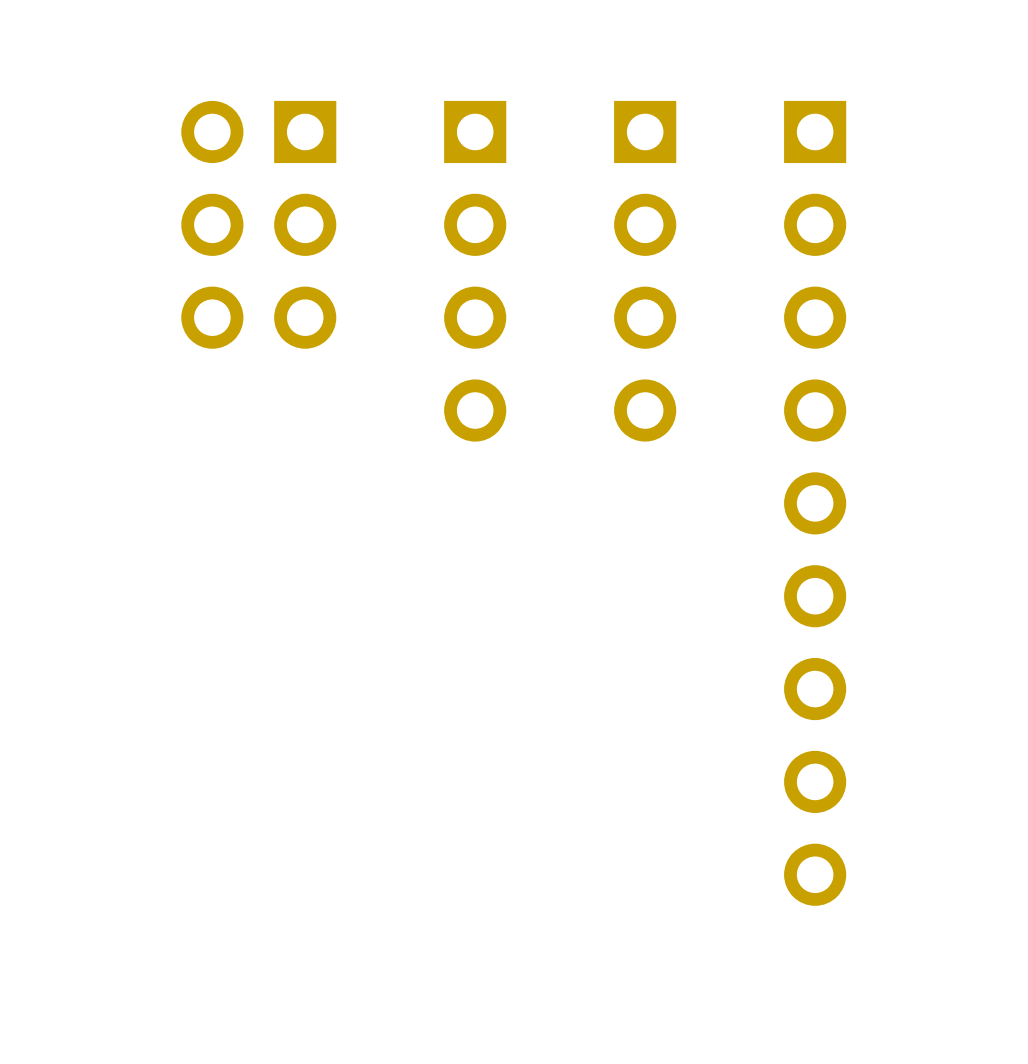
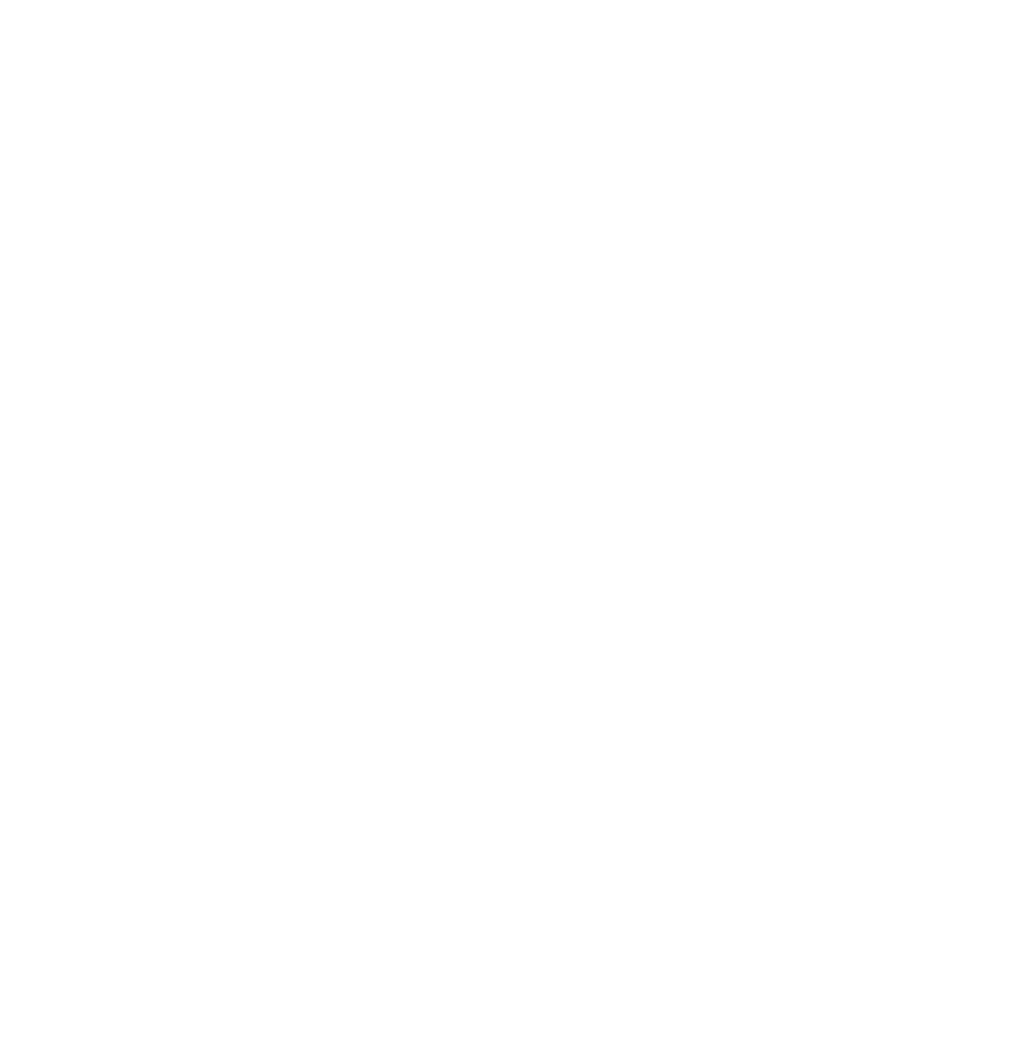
part: (258, 224) -> none
part: (475, 271) -> none
part: (645, 271) -> none
part: (815, 503) -> none

